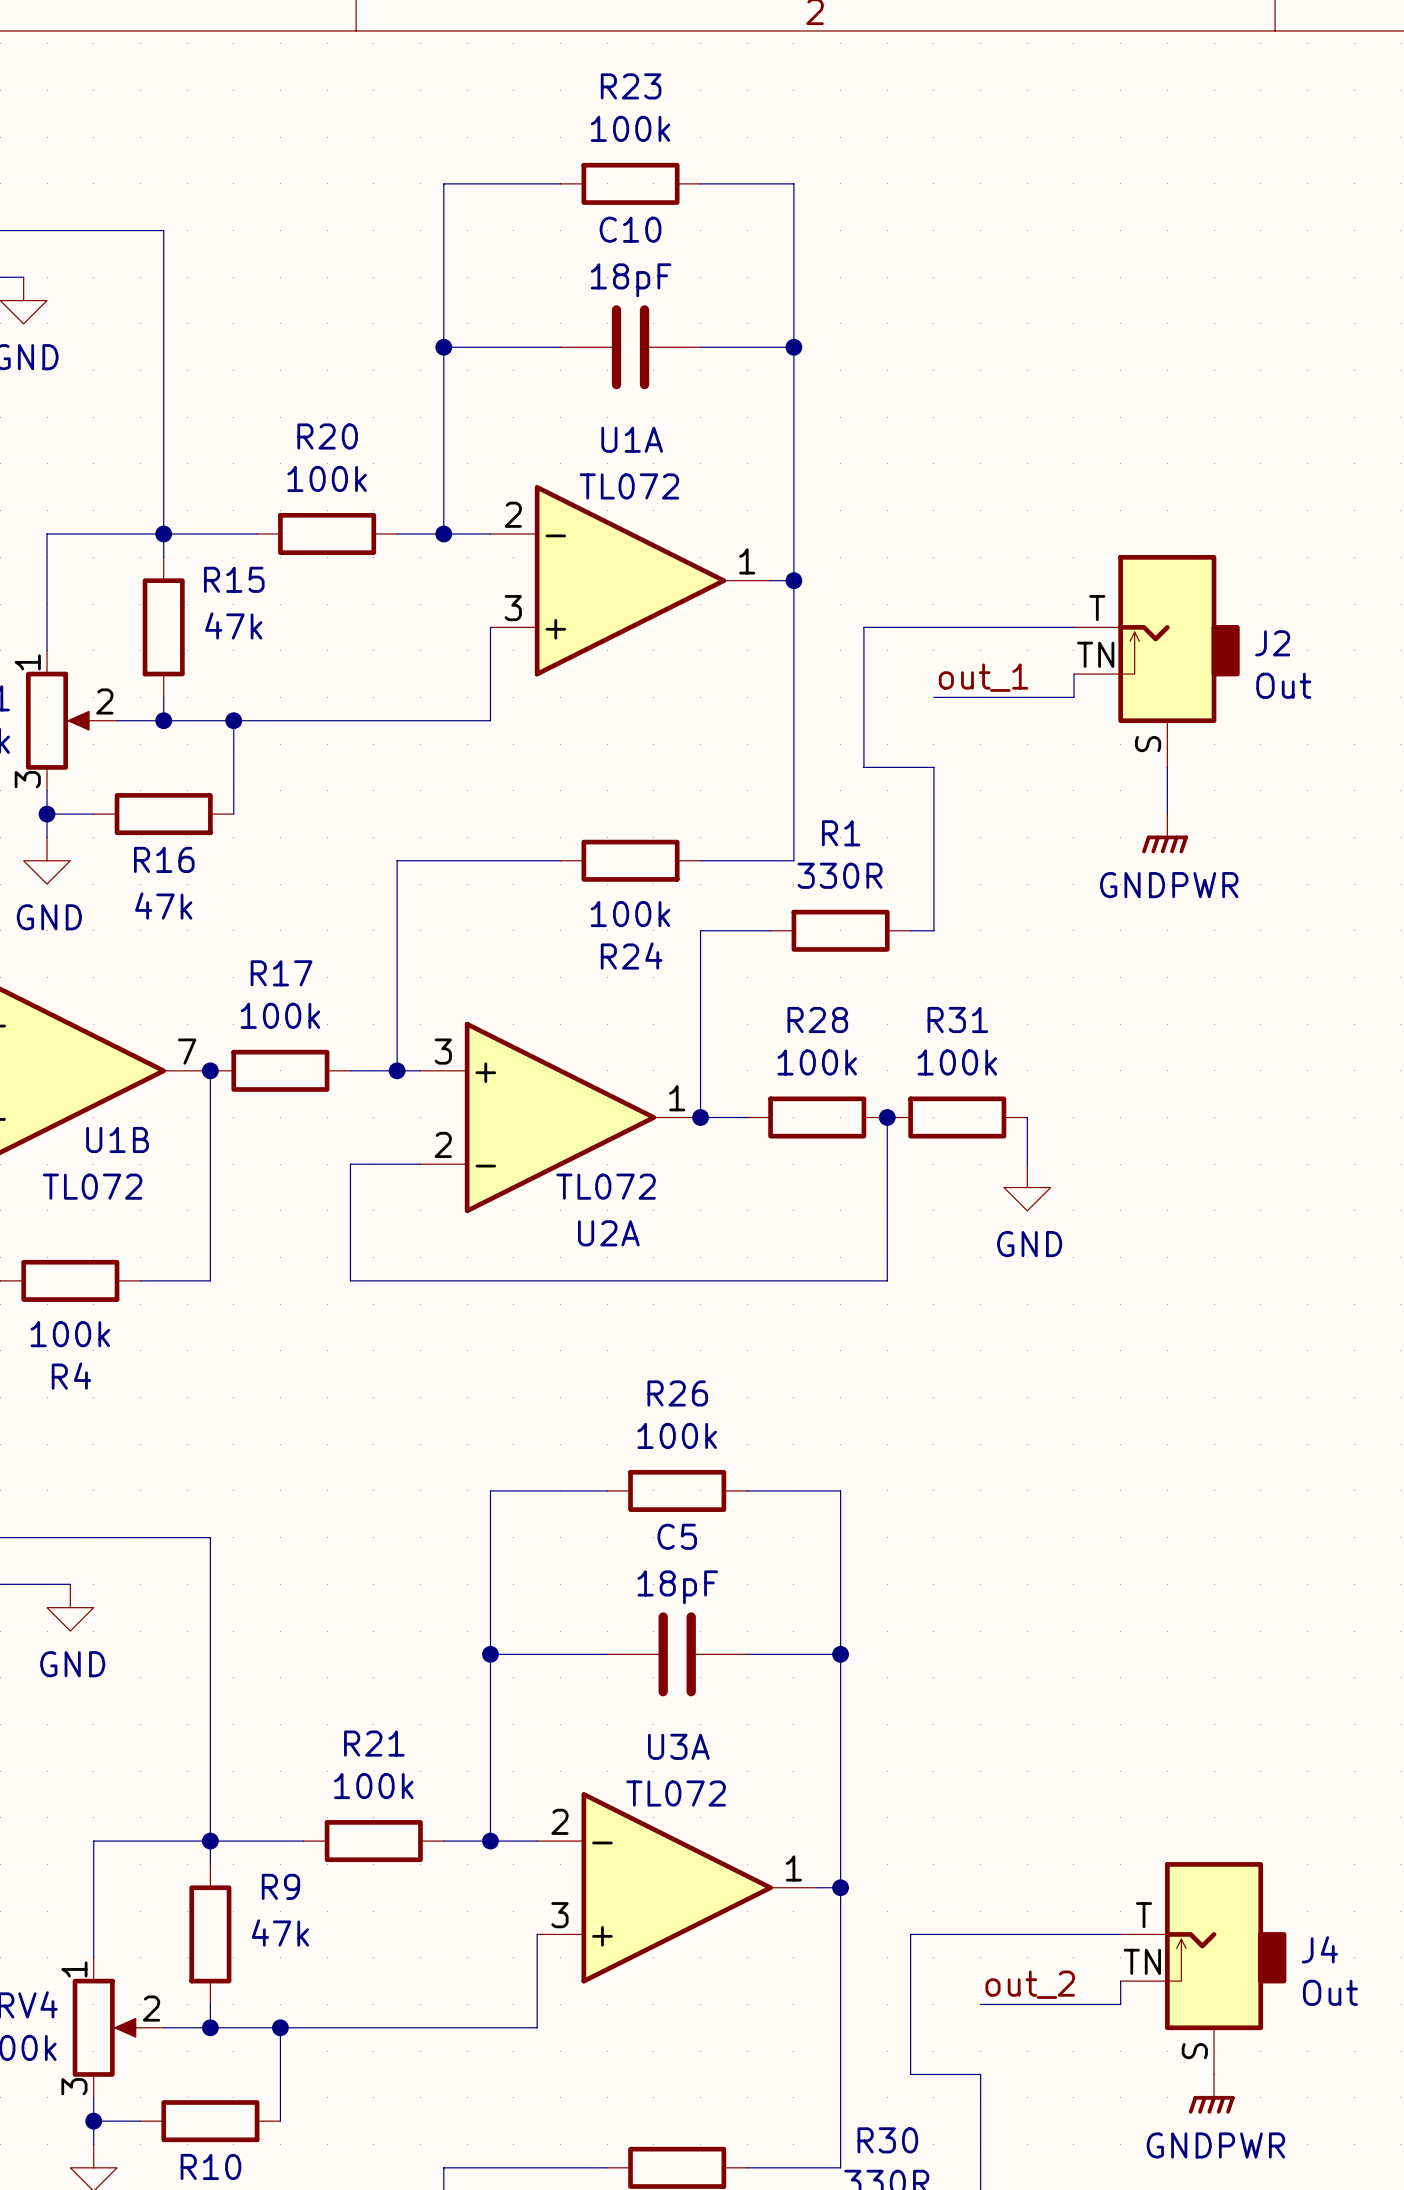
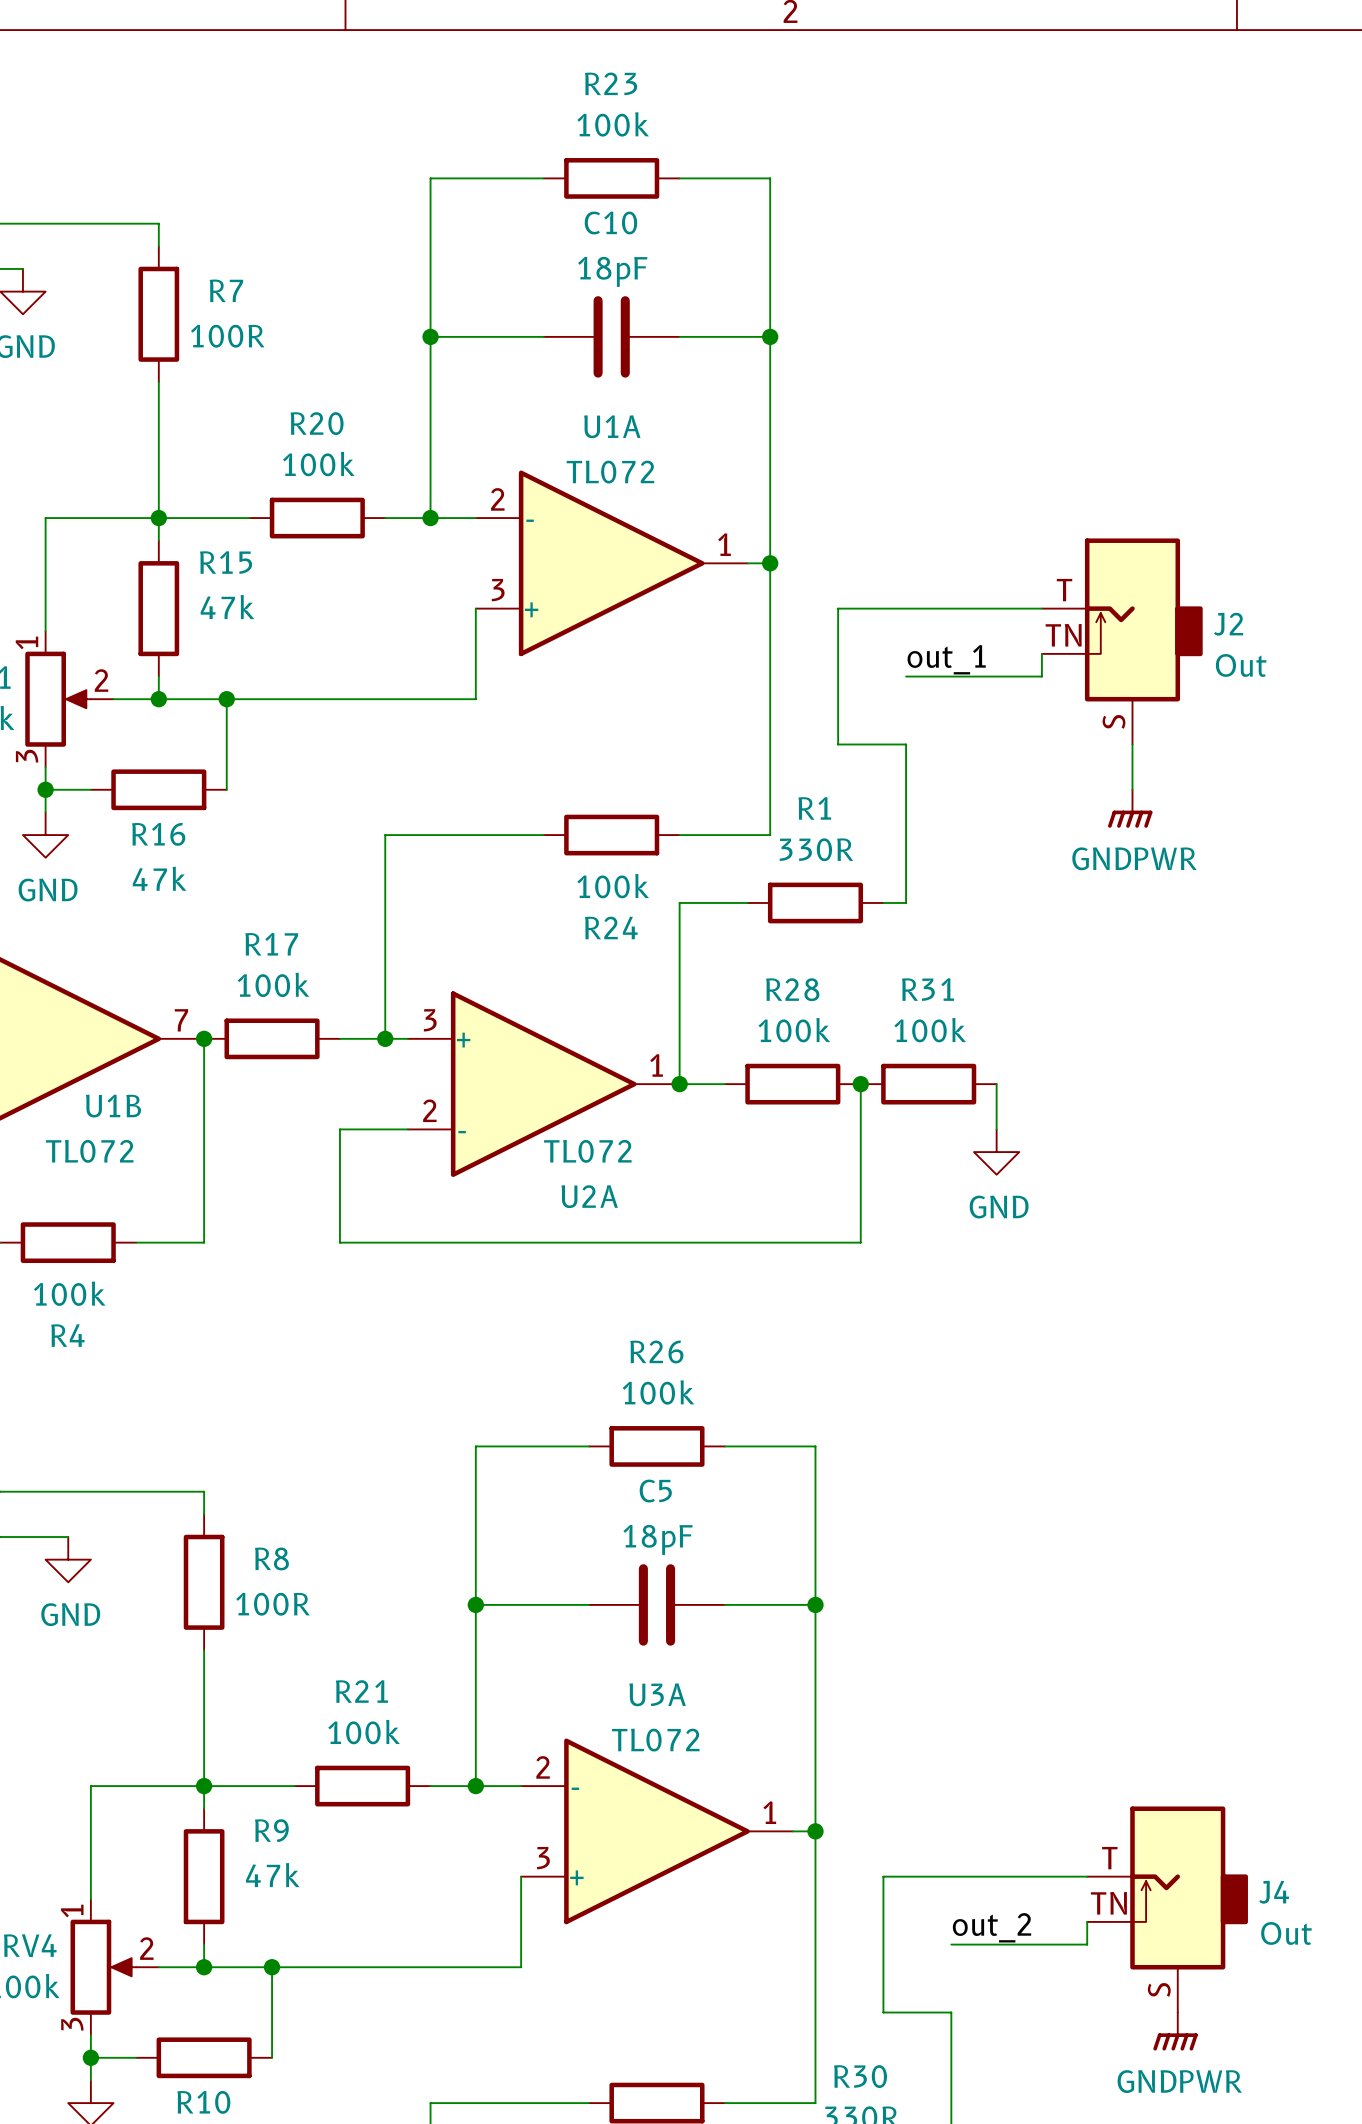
wire: (163, 253) (163, 393) -> none
R7: none -> 100R (158, 314)
wire: (210, 1560) (210, 1701) -> none
R8: none -> 100R (204, 1582)

